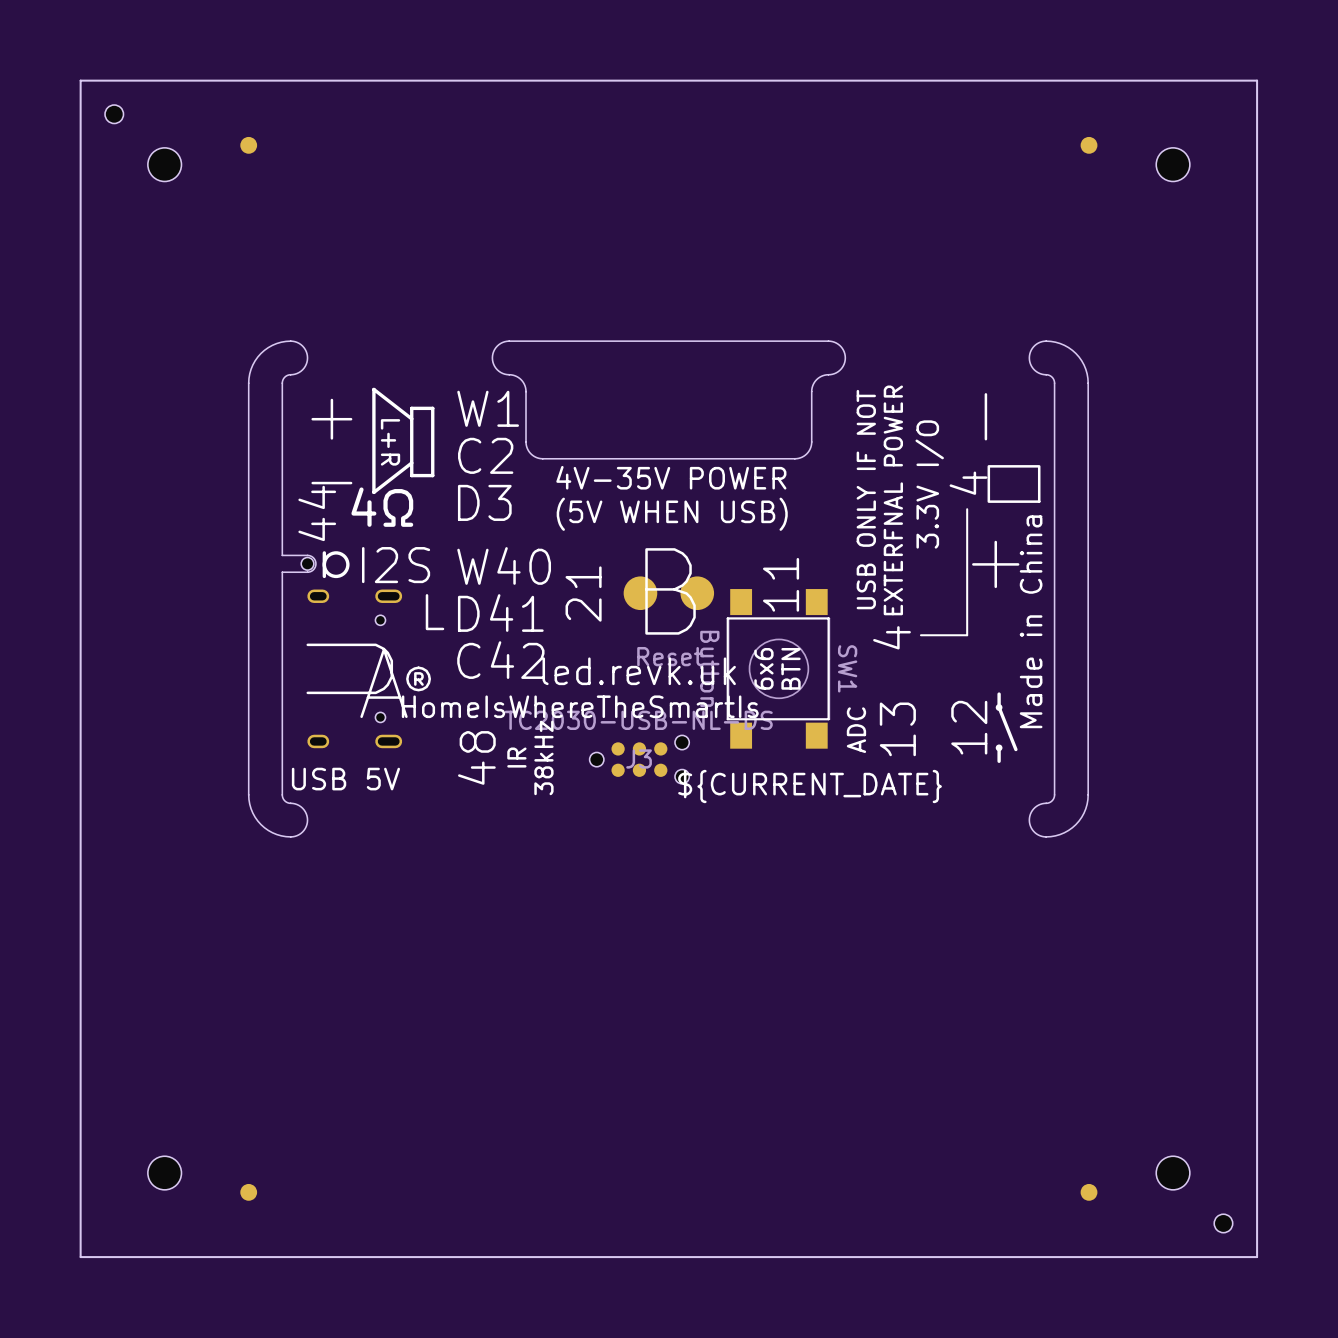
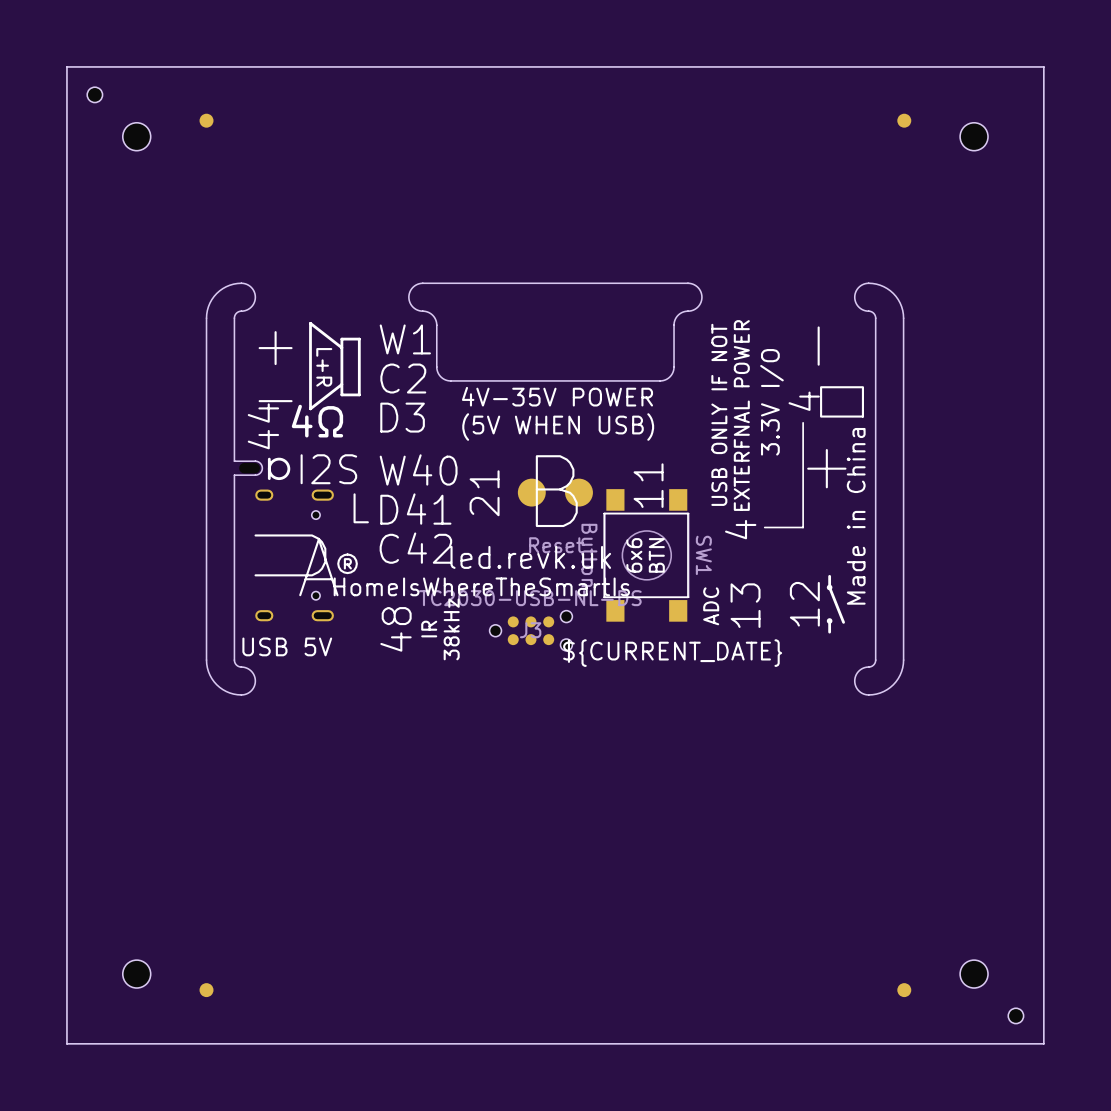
part footprint: [301, 557, 314, 571] -> [239, 462, 261, 474]

